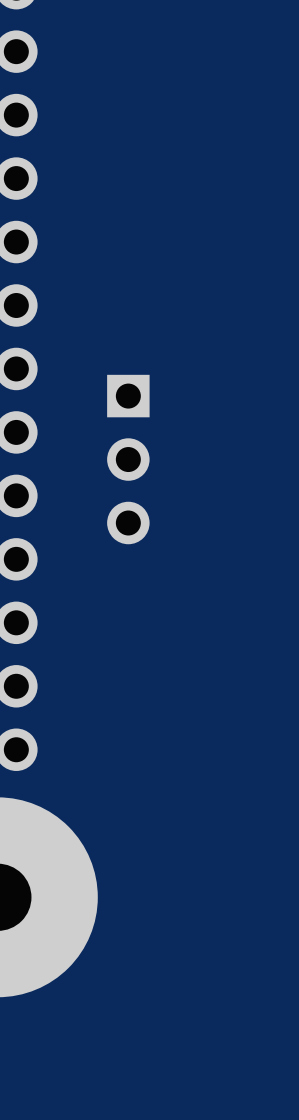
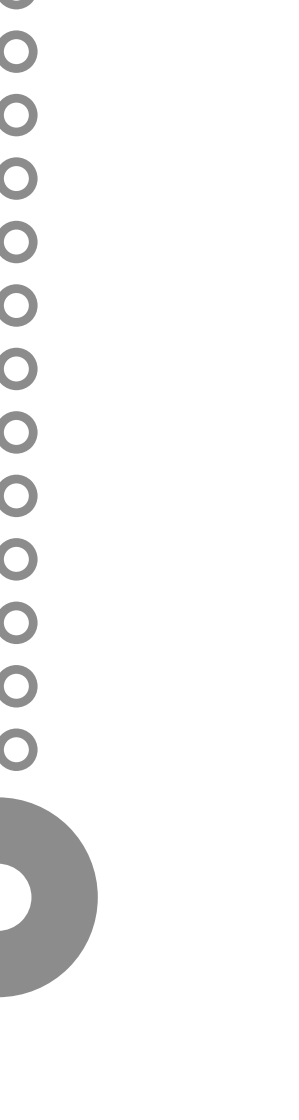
part: (128, 459) -> none

